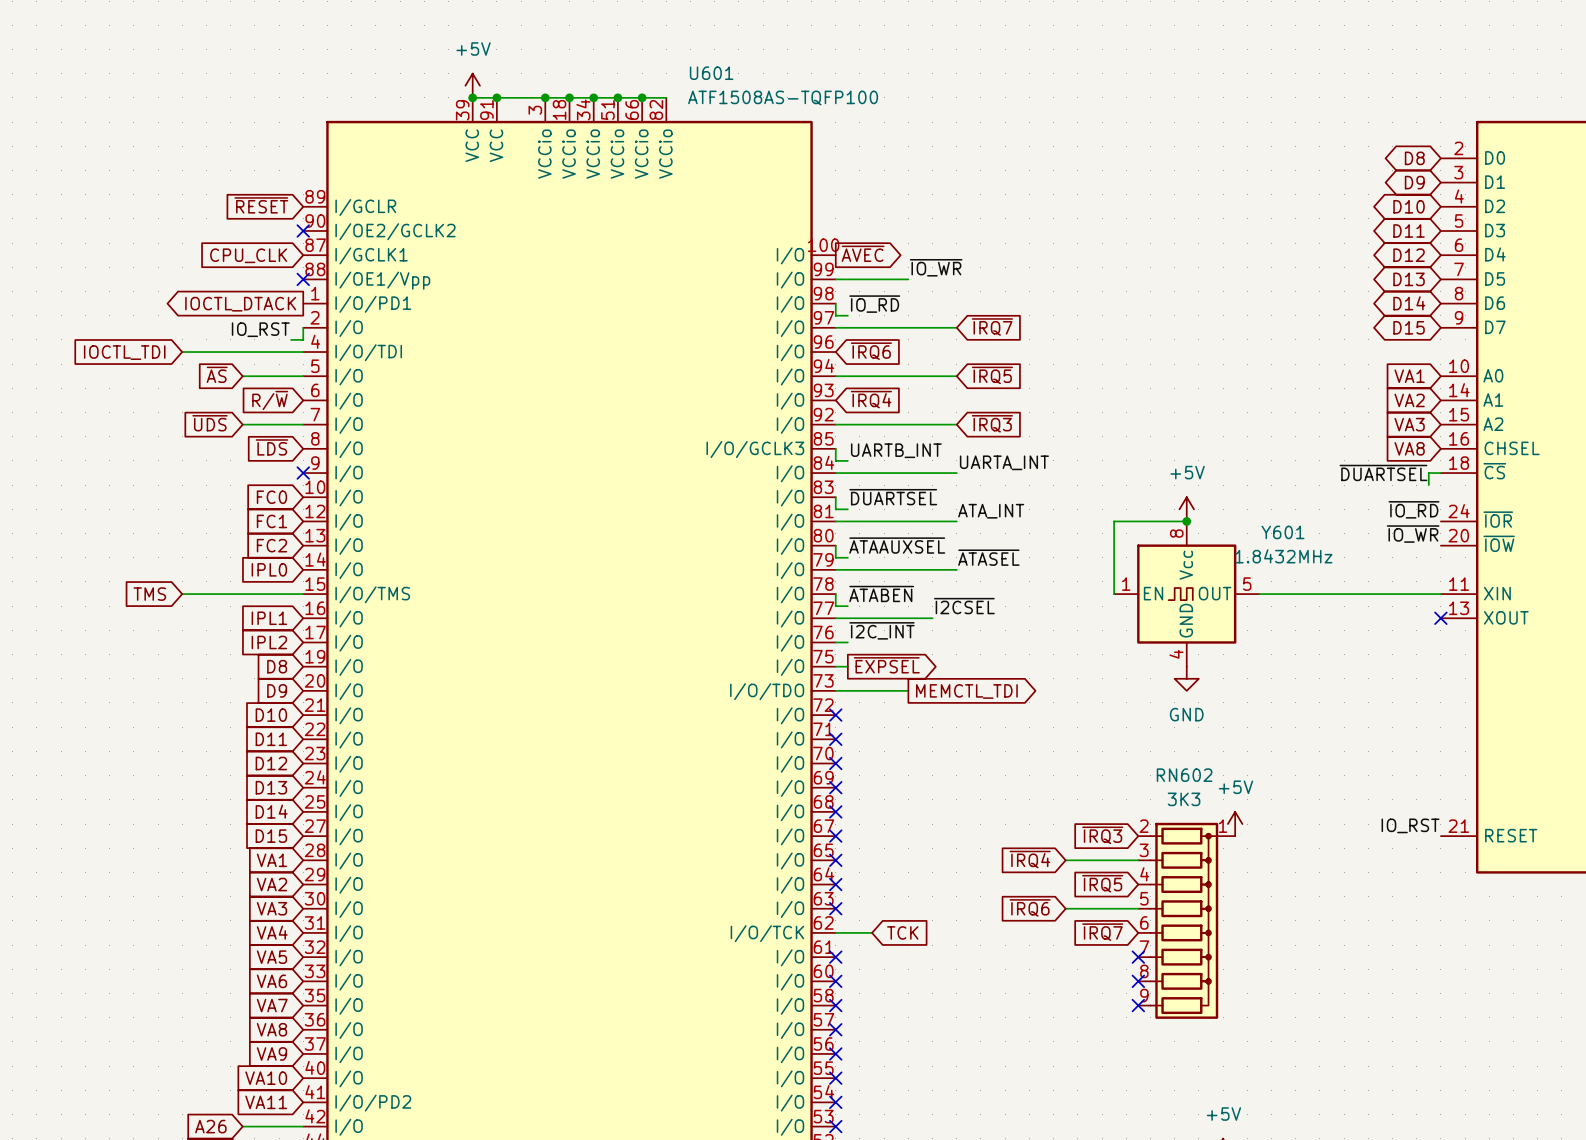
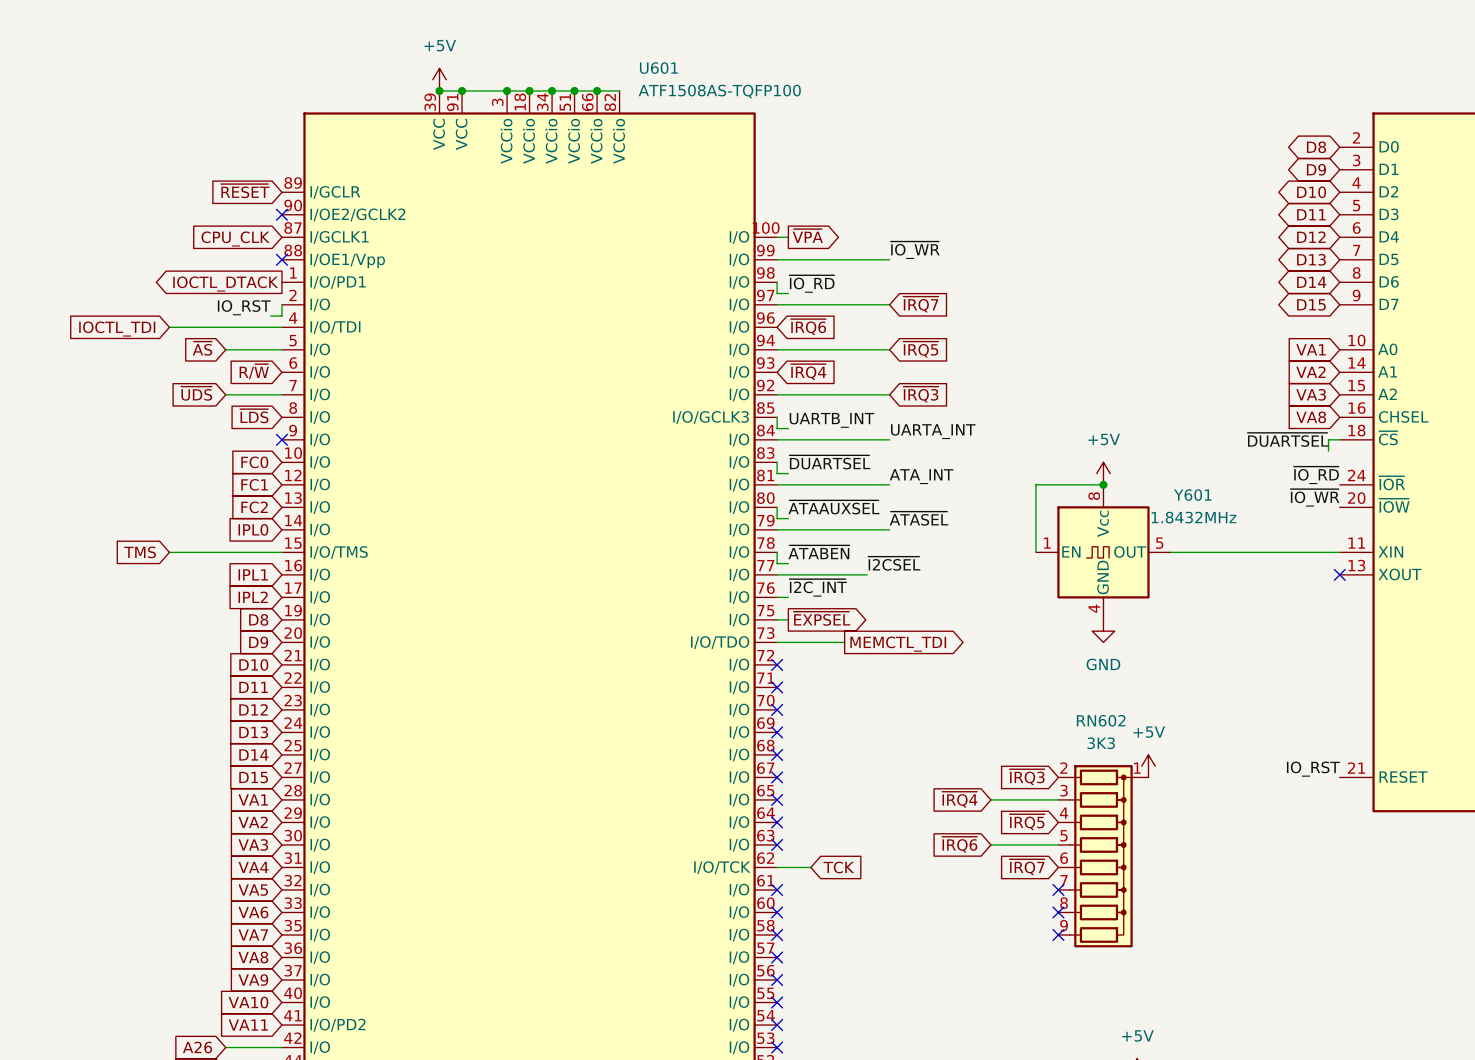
global label: ~{AVEC} (863, 253) -> ~{VPA} (807, 235)
wire: none -> (777, 237) (788, 237)
label position: ~{IO_WR} (936, 267) -> ~{IO_WR} (915, 250)
wire: none -> (844, 259) (889, 259)

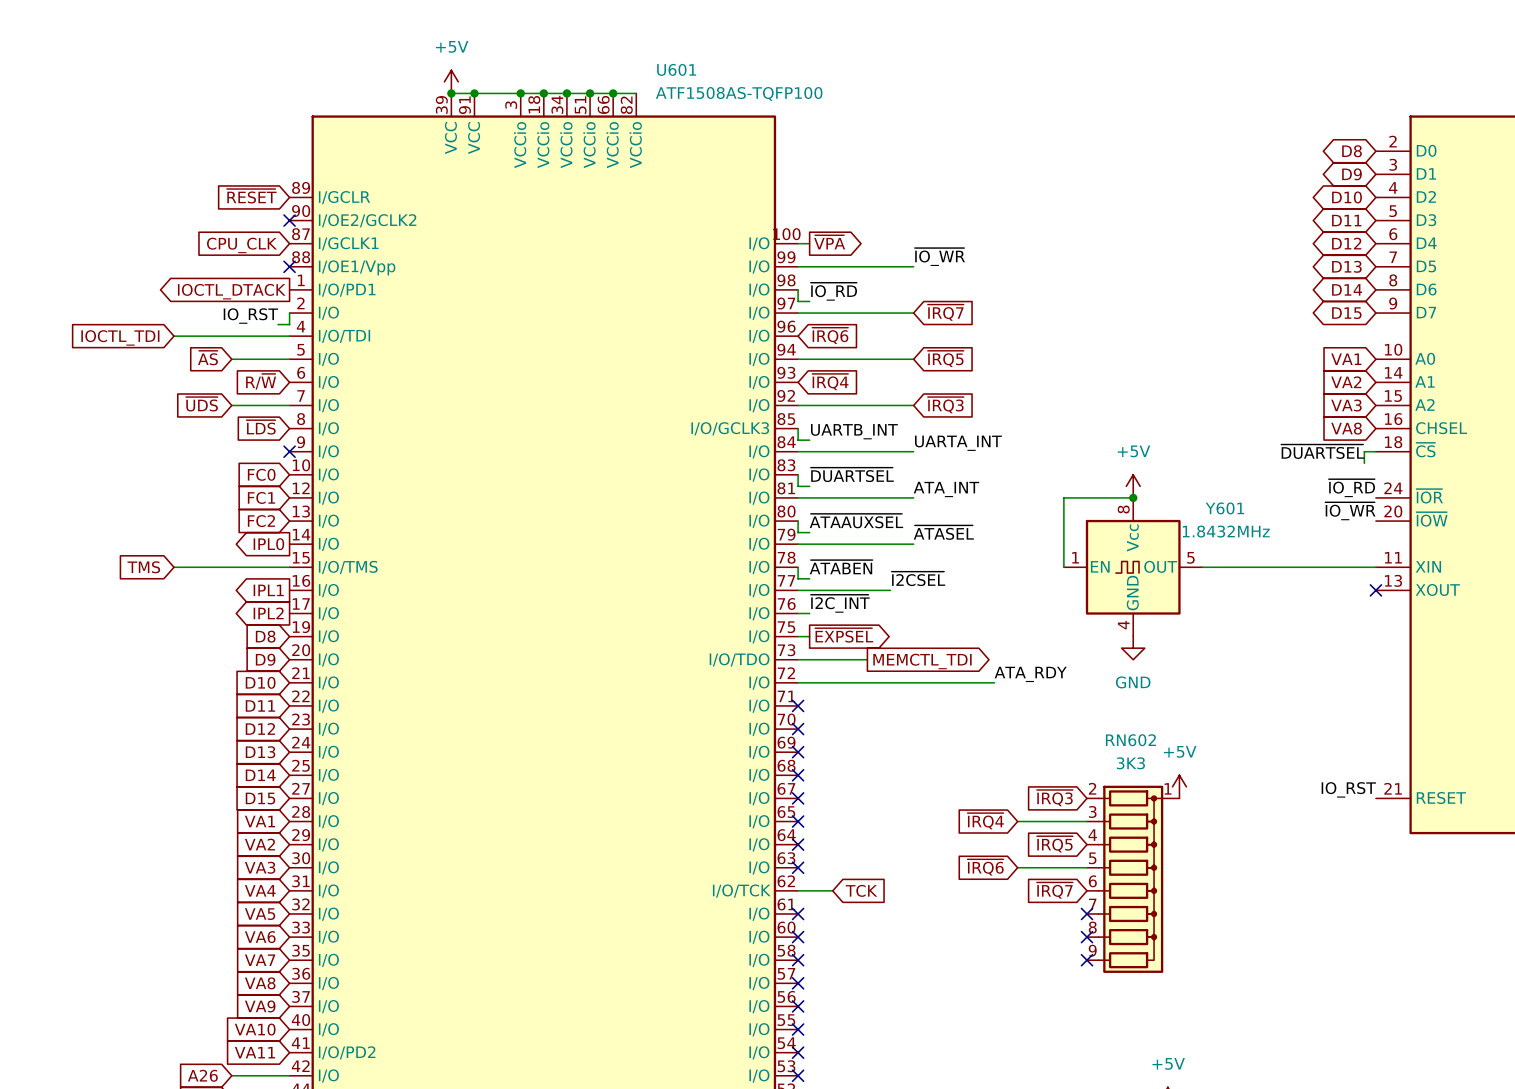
global label shape: input (253, 529) -> output (268, 544)
global label shape: input (253, 574) -> output (268, 590)
global label shape: input (253, 597) -> output (268, 613)
label: none -> ATA_RDY (1030, 674)
wire: none -> (798, 682) (994, 682)
no-connect mark: (777, 664) -> none

